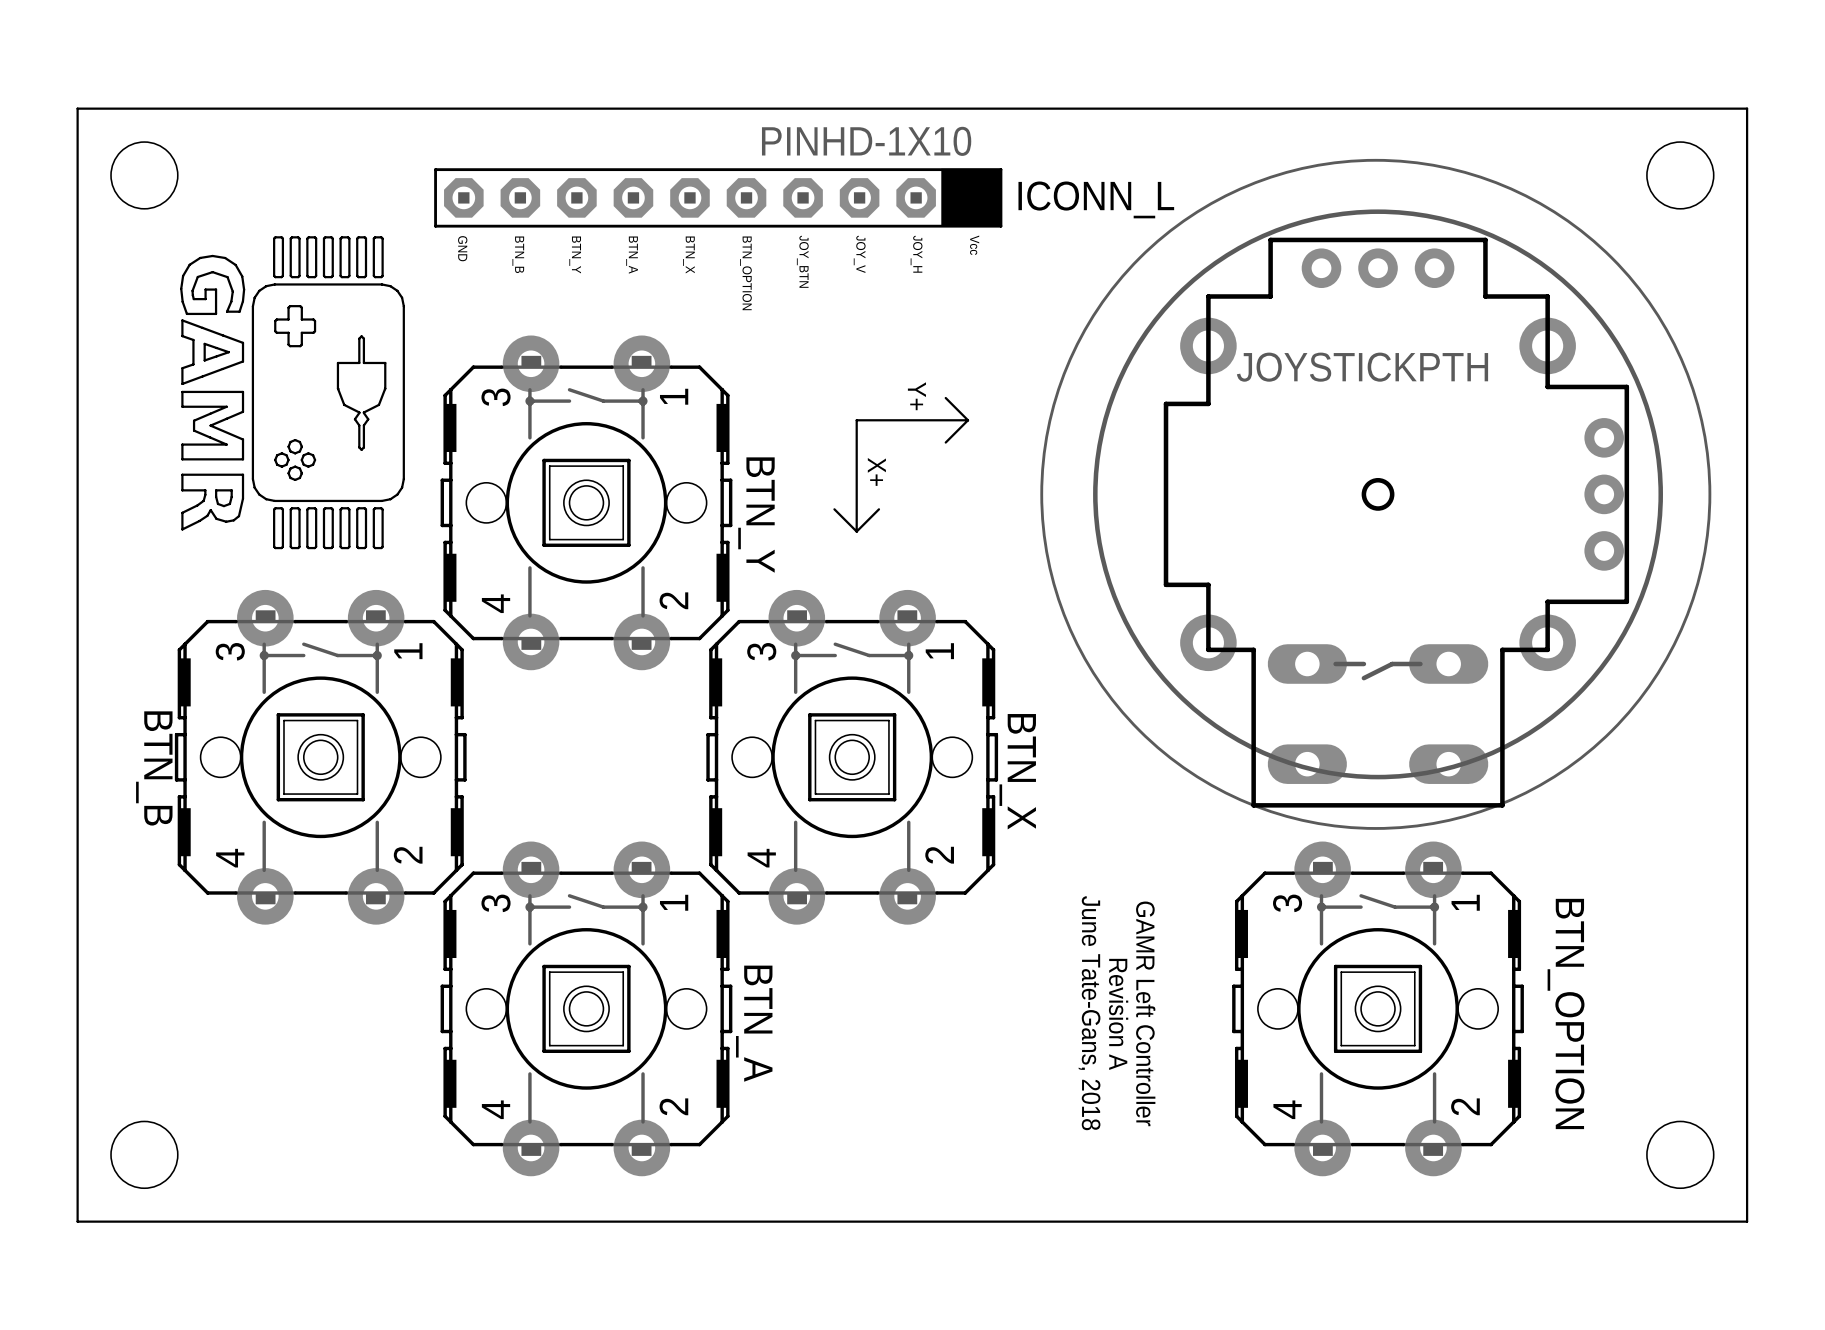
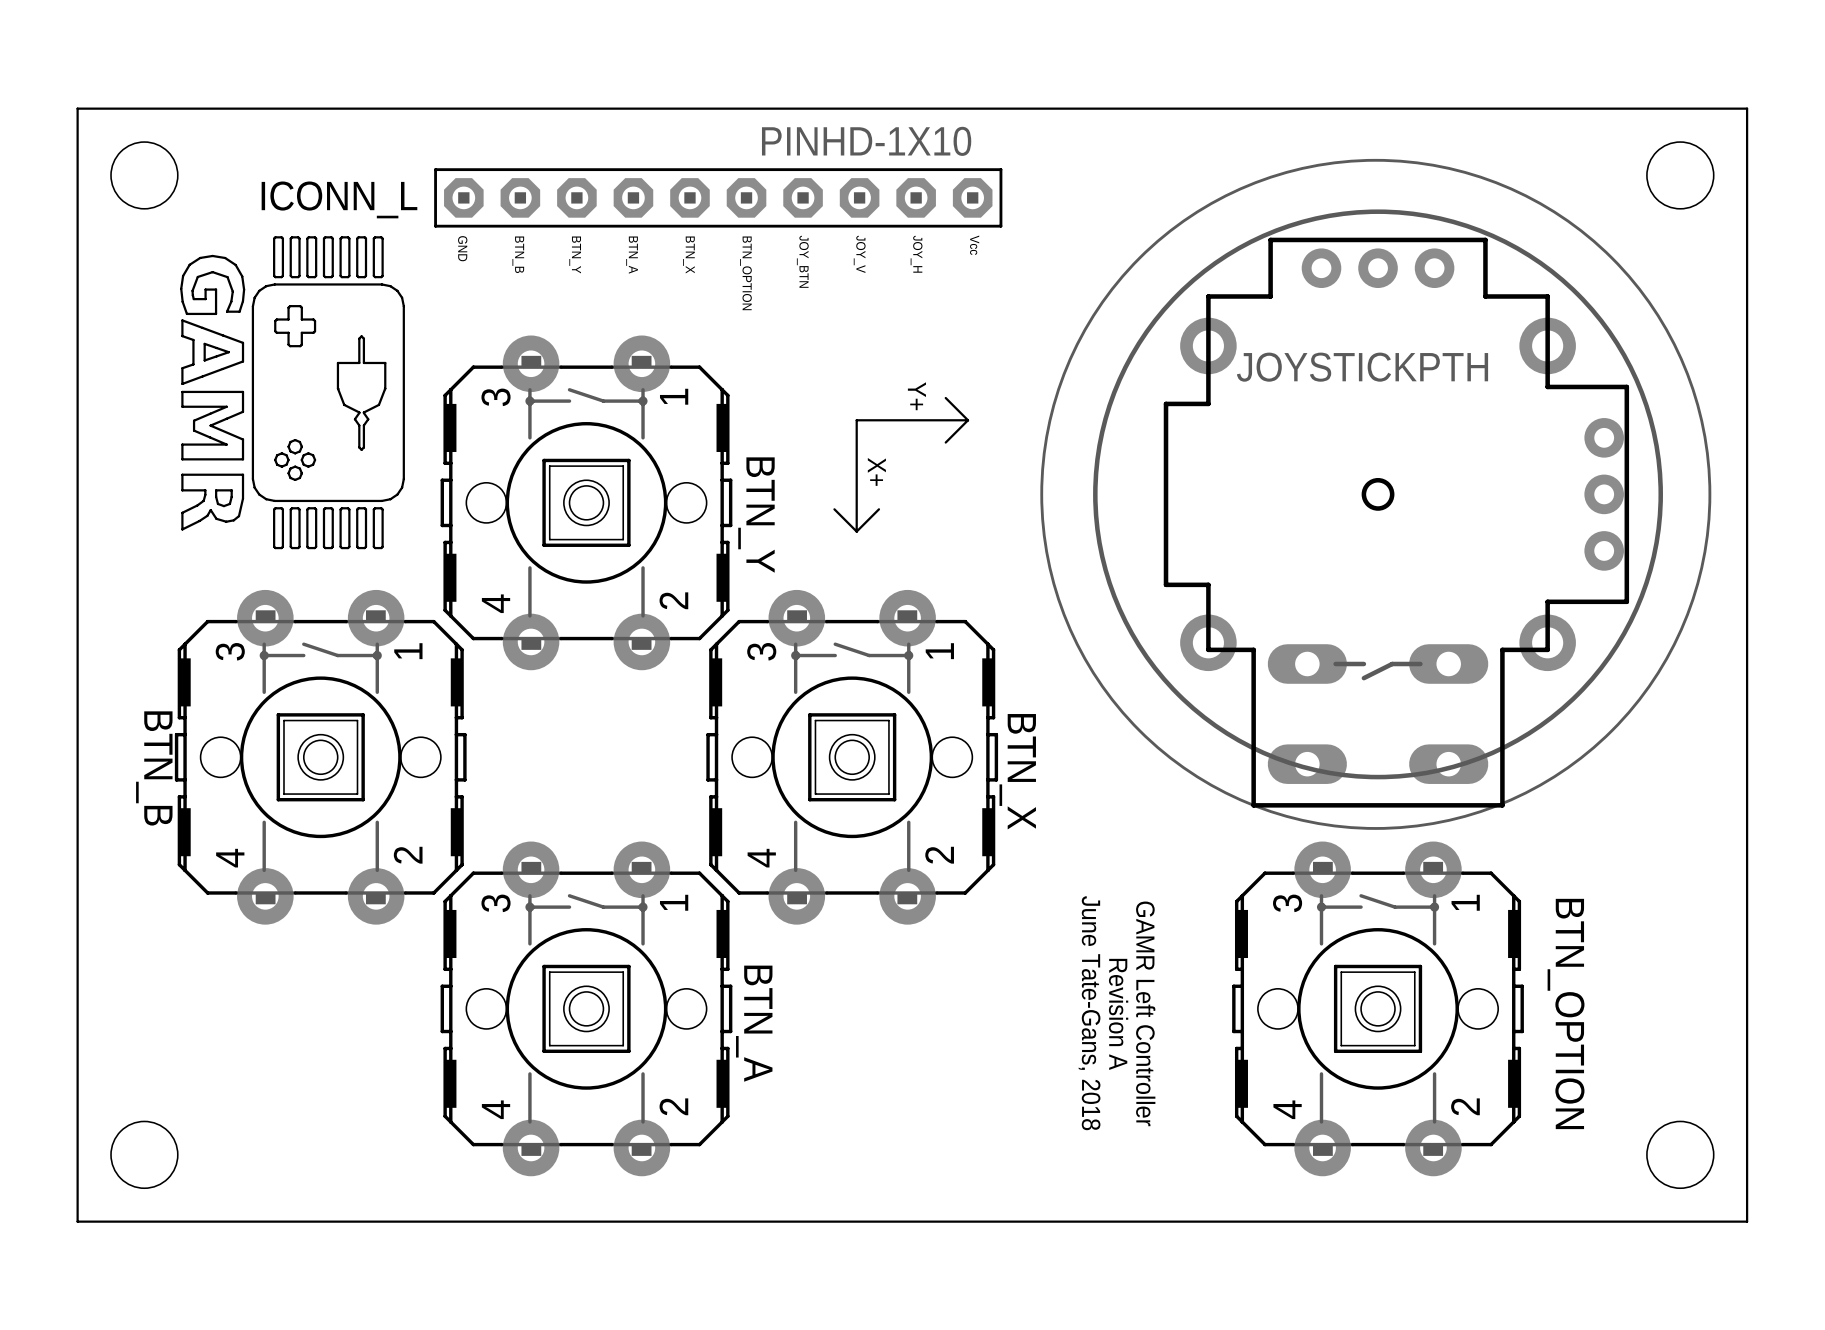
drawing: [941, 168, 1002, 227] -> none
ICONN_L name position: ICONN_L (1096, 199) -> ICONN_L (339, 199)

